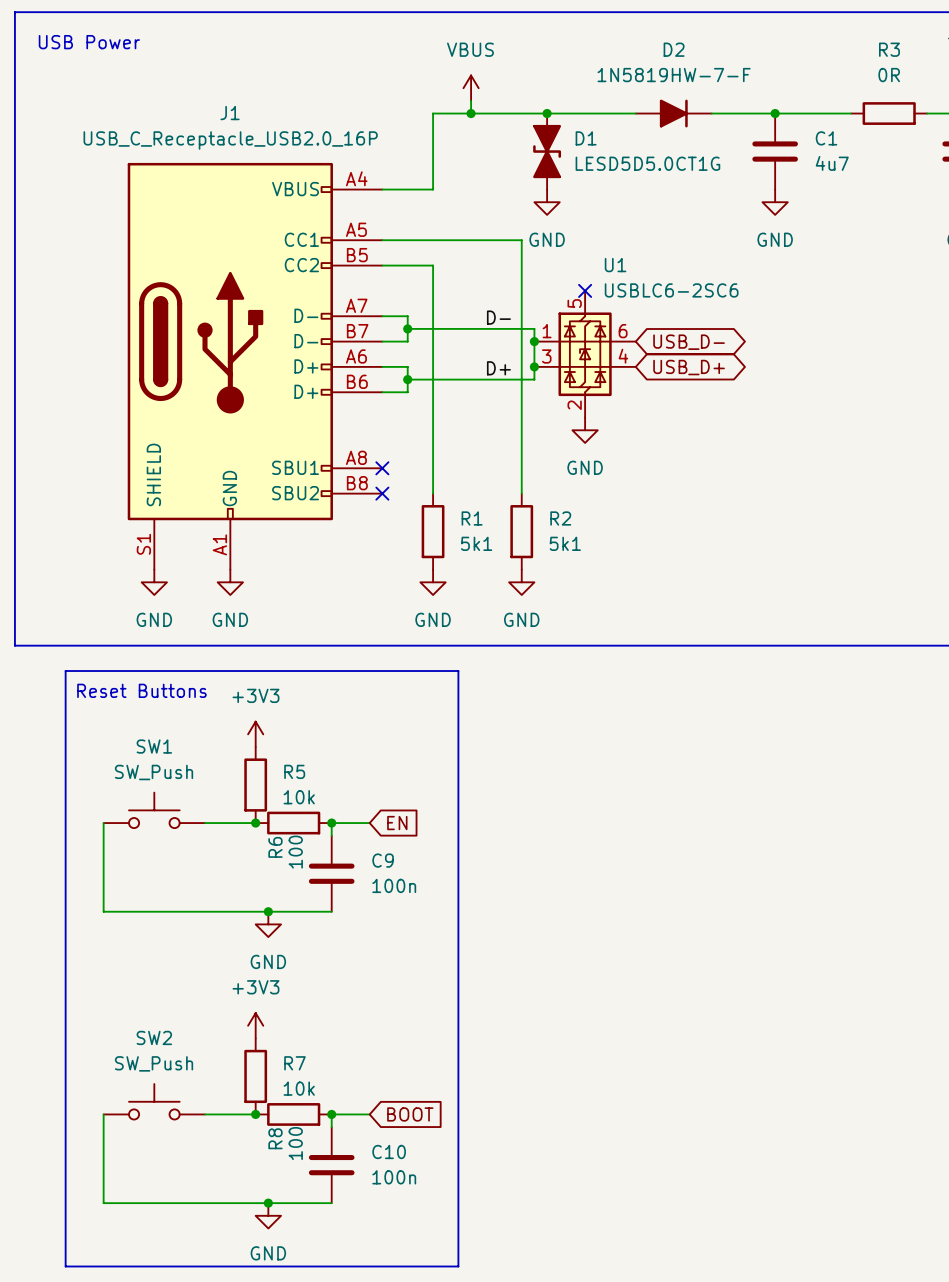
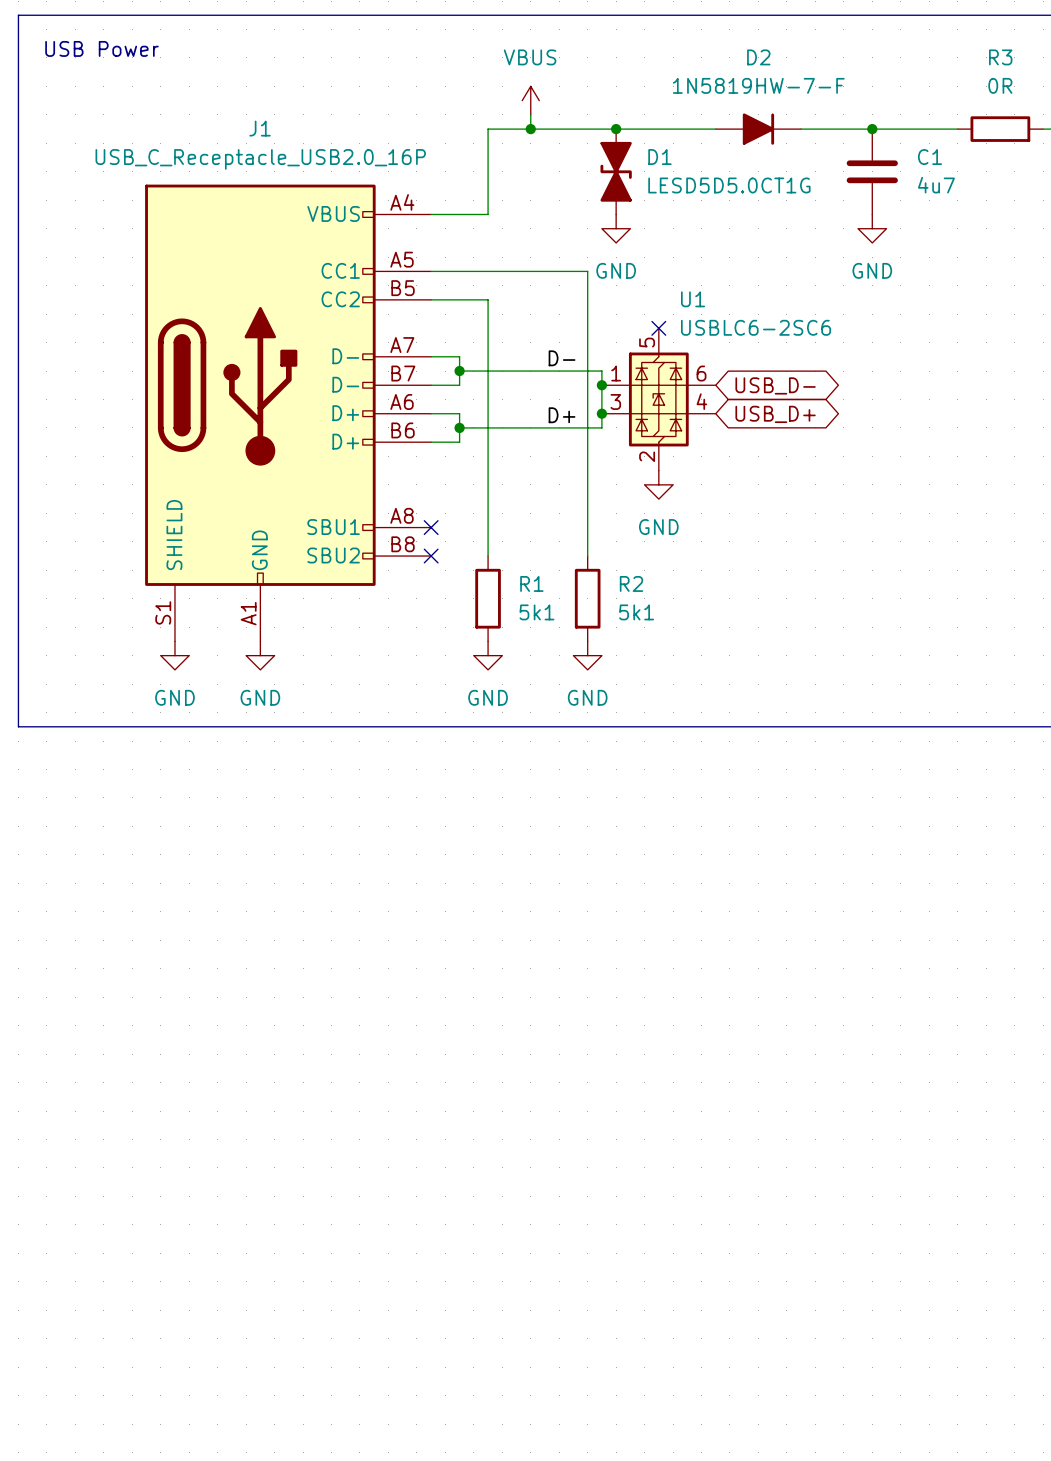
line: (65, 671) (458, 671) (458, 1266) (65, 1266) (65, 671) -> none
text: Reset Buttons (141, 690) -> none
power symbol: +3V3 (255, 734) -> none
R5: 10k (255, 785) -> none
SW1: SW_Push (154, 810) -> none
wire: (103, 823) (103, 911) (331, 911) -> none
wire: (205, 823) (255, 823) -> none
junction: (255, 823) -> none
R6: 100 (293, 823) -> none
junction: (331, 823) -> none
wire: (369, 823) (331, 823) (331, 835) -> none
global label: EN (397, 823) -> none
C9: 100n (331, 873) -> none
junction: (268, 911) -> none
power symbol: GND (268, 924) -> none
power symbol: +3V3 (255, 1025) -> none
R7: 10k (255, 1076) -> none
SW2: SW_Push (154, 1101) -> none
wire: (103, 1114) (103, 1203) (331, 1203) -> none
wire: (205, 1114) (255, 1114) -> none
junction: (255, 1114) -> none
R8: 100 (293, 1114) -> none
junction: (331, 1114) -> none
wire: (369, 1114) (331, 1114) (331, 1127) -> none
global label: BOOT (410, 1114) -> none
C10: 100n (331, 1165) -> none
junction: (268, 1203) -> none
power symbol: GND (268, 1215) -> none

